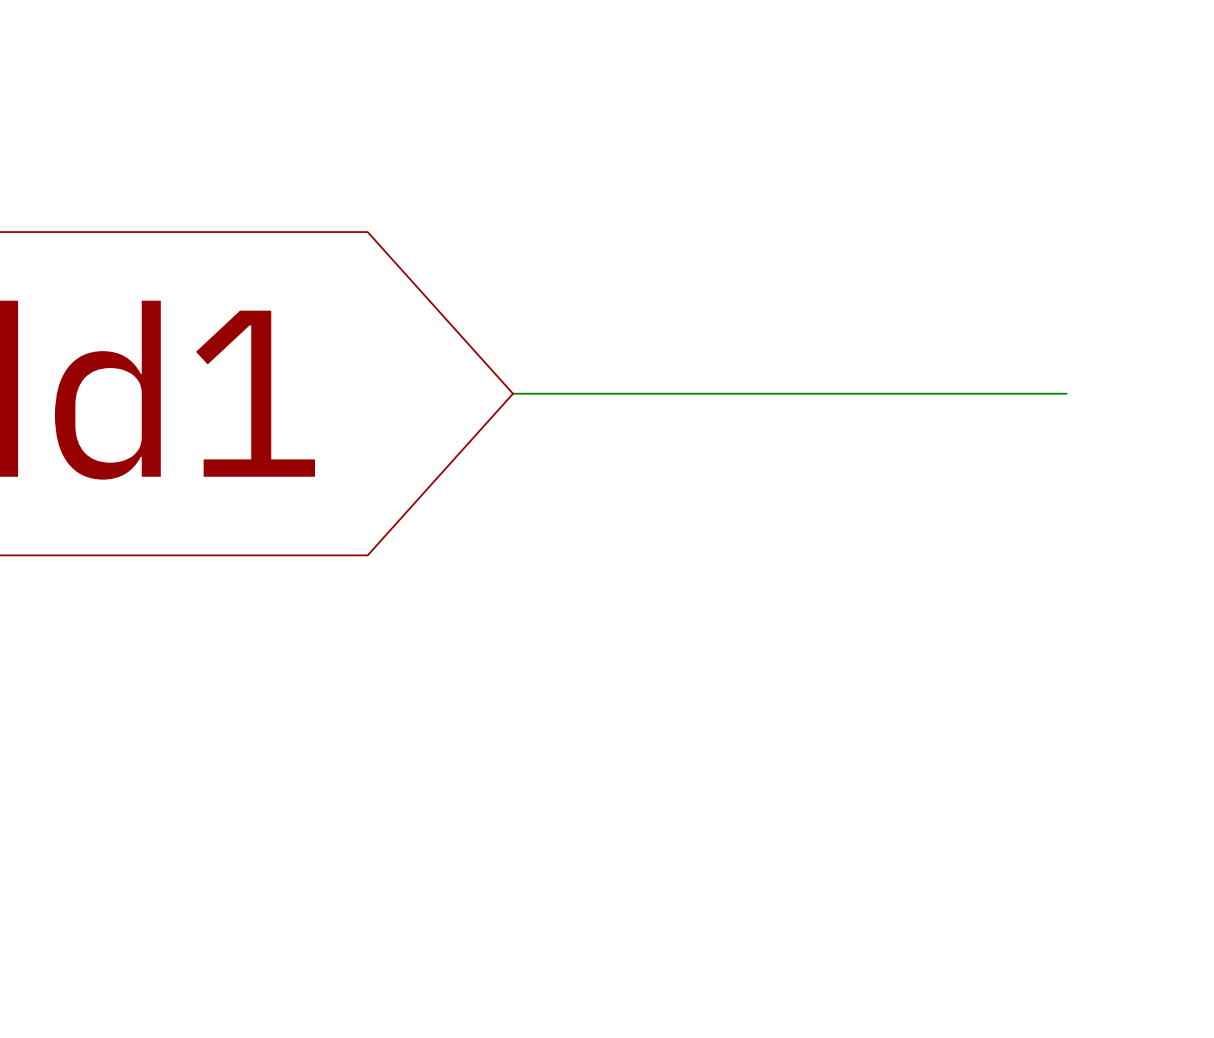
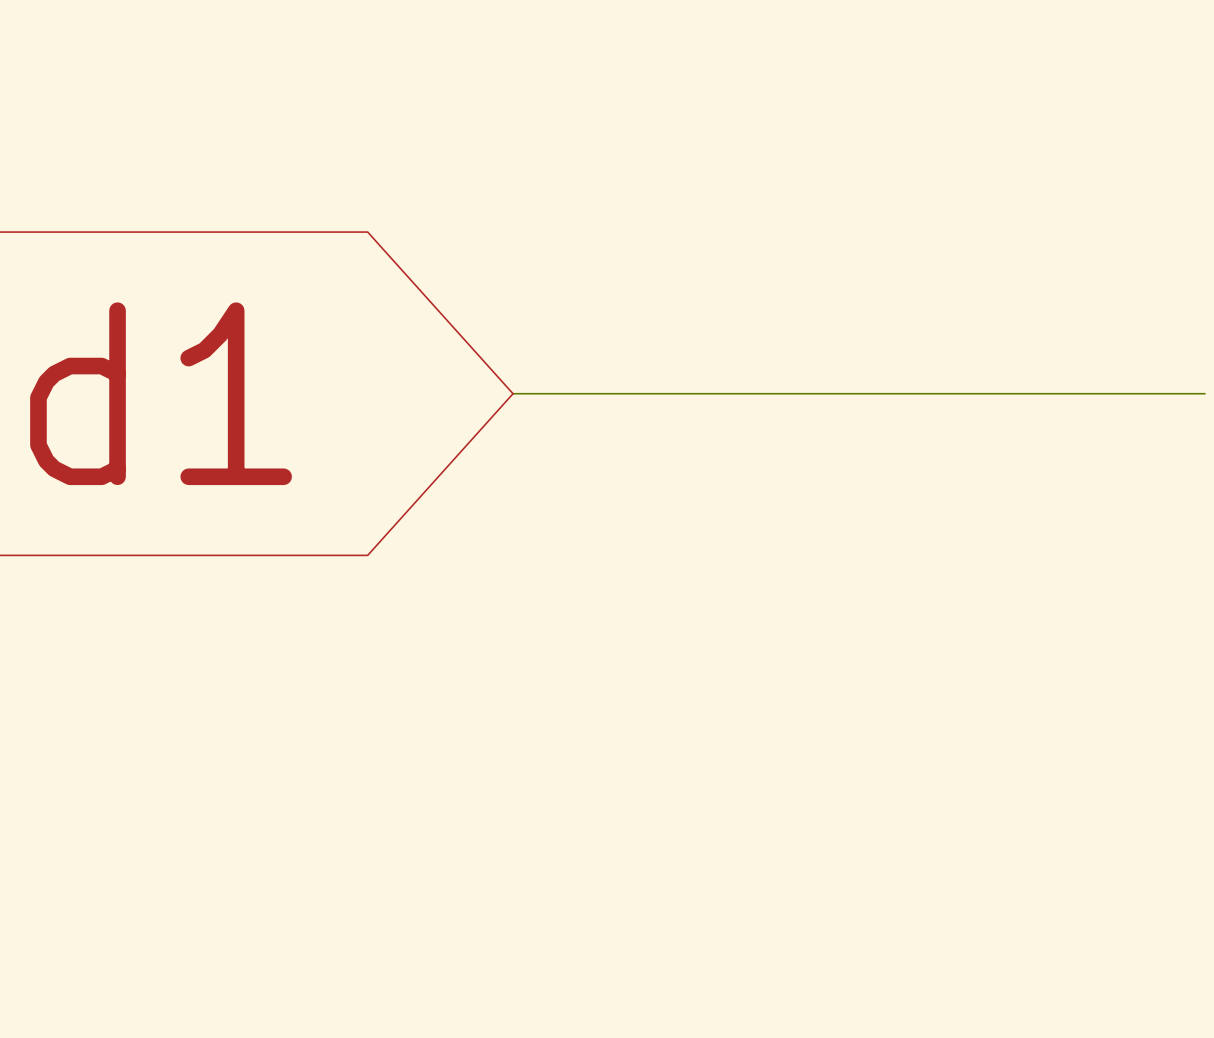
wire: none -> (1066, 393) (1205, 393)

